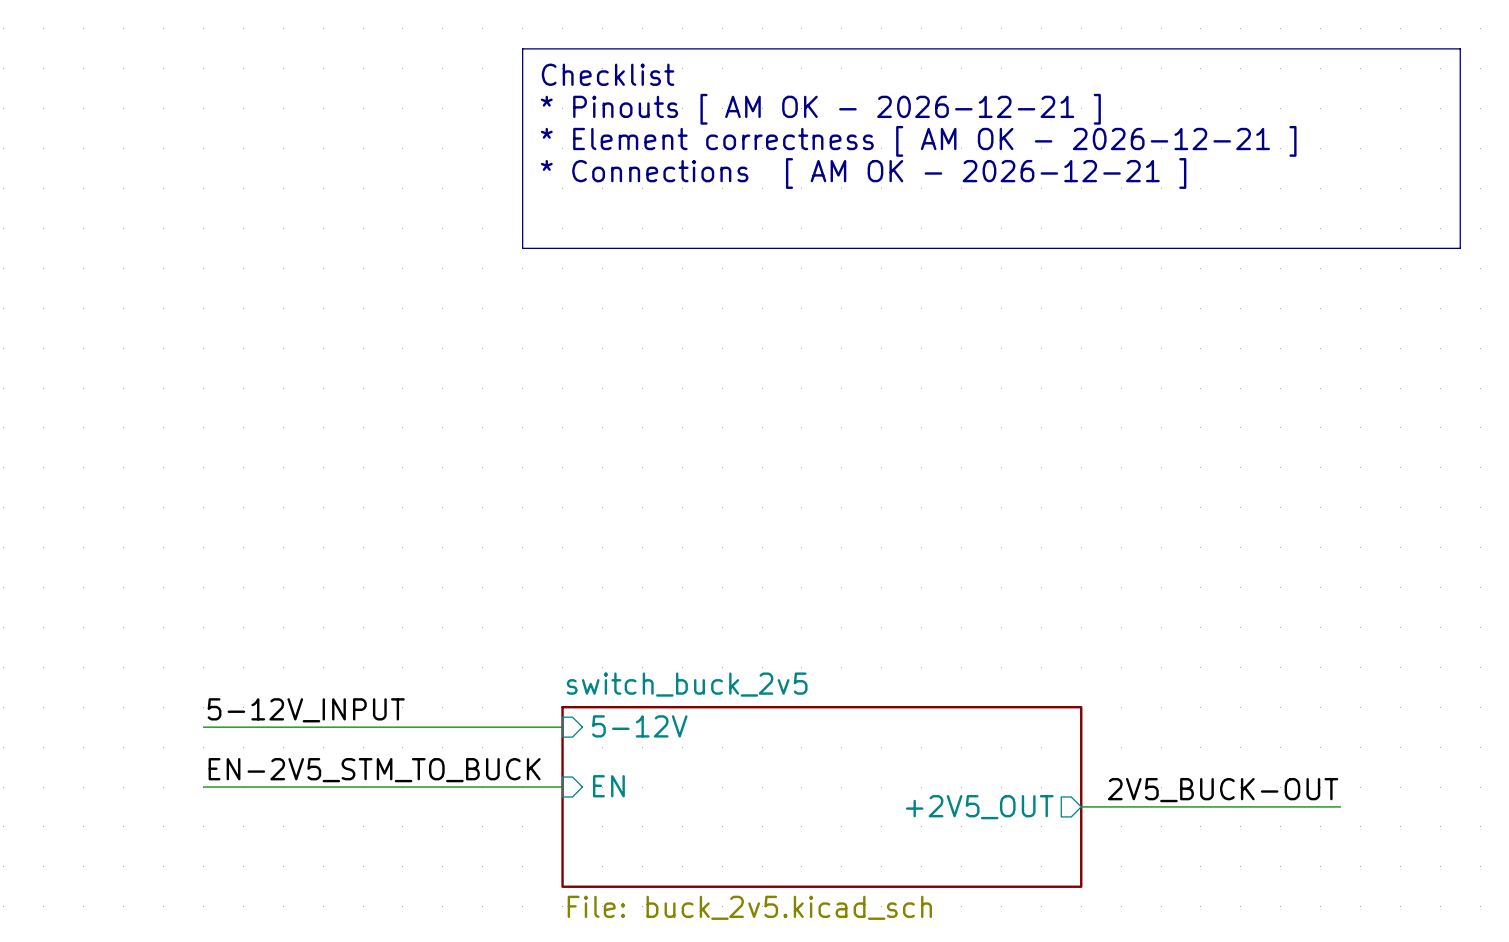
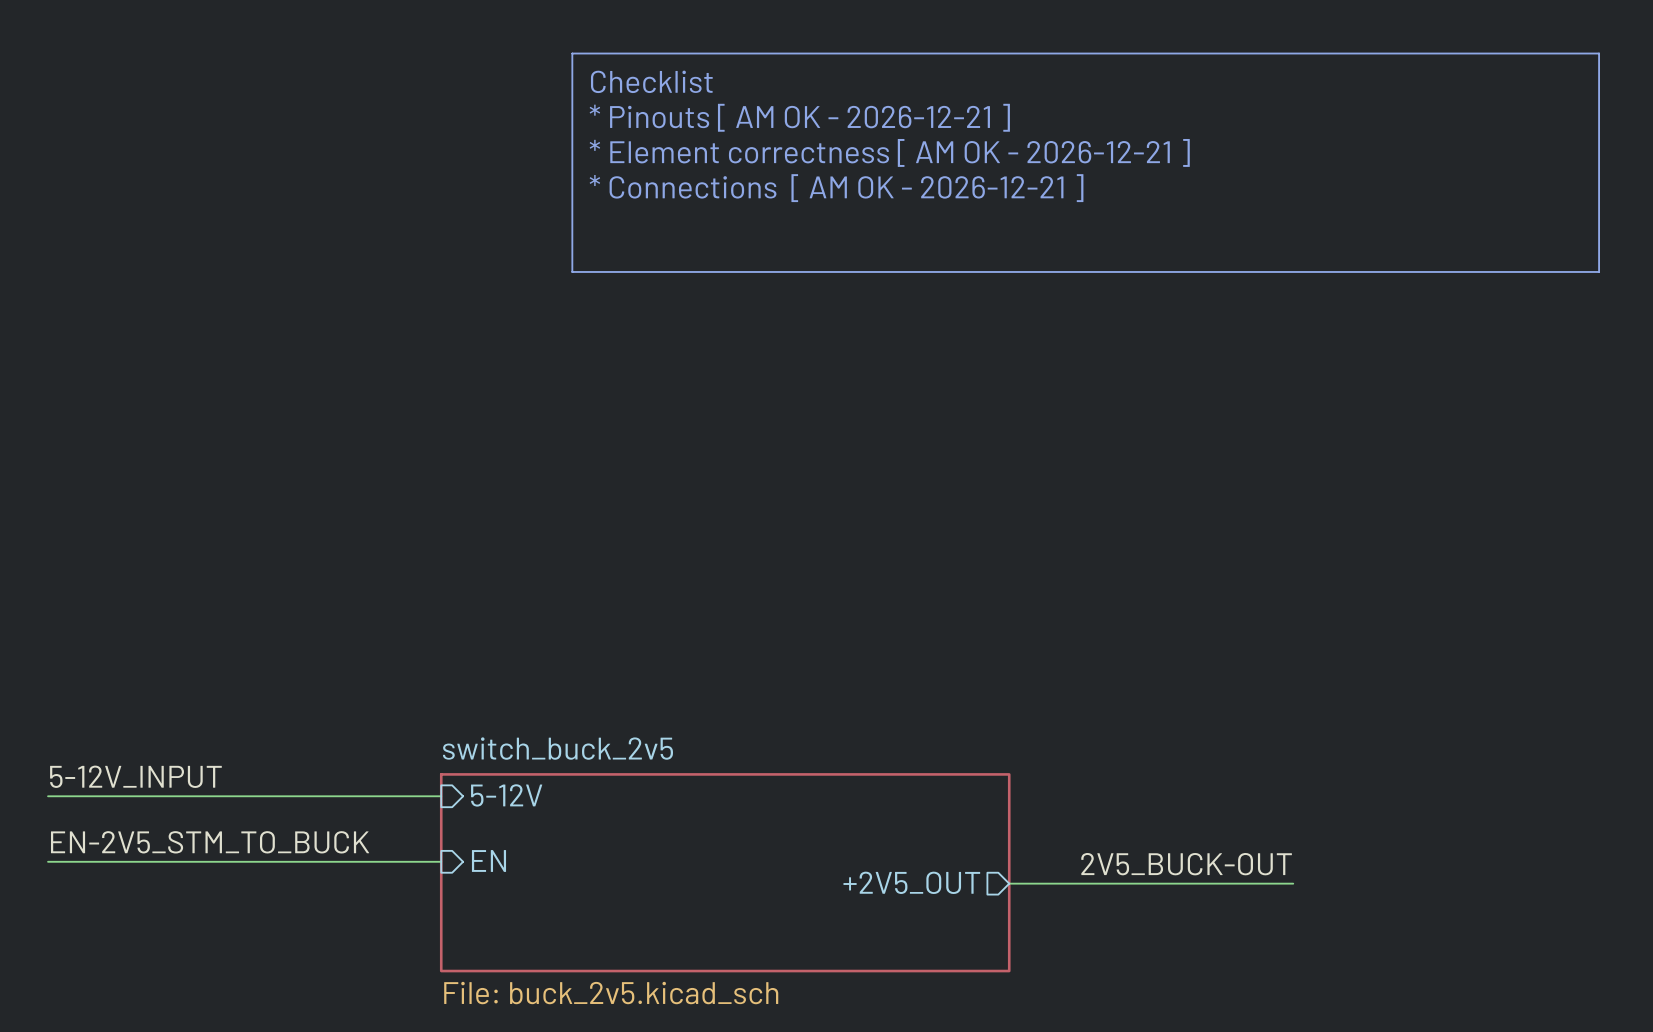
label position: 5-12V_INPUT (306, 710) -> 5-12V_INPUT (135, 776)
sheet pin position: 5-12V (639, 726) -> 5-12V (506, 795)
wire: (402, 727) (562, 727) -> (48, 796) (222, 796)
label position: EN-2V5_STM_TO_BUCK (374, 770) -> EN-2V5_STM_TO_BUCK (210, 842)
sheet pin position: EN (608, 786) -> EN (488, 860)
wire: (402, 787) (562, 787) -> (48, 861) (222, 861)
label position: 2V5_BUCK-OUT (1223, 790) -> 2V5_BUCK-OUT (1186, 864)
sheet switch_buck_2v5 position: (821, 796) -> (725, 872)
wire: (1180, 806) (1340, 806) -> (1009, 883) (1184, 883)
sheet pin position: +2V5_OUT (979, 807) -> +2V5_OUT (911, 882)

